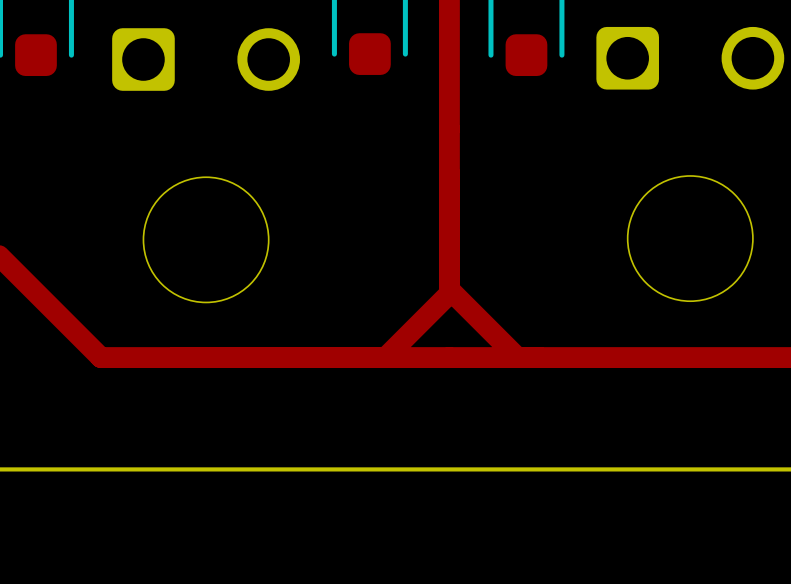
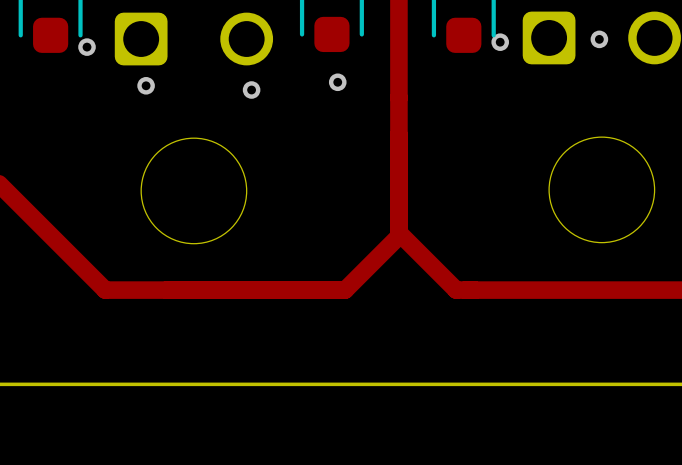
via: none -> (599, 39)
via: none -> (500, 42)
via: none -> (87, 47)
via: none -> (337, 82)
via: none -> (146, 85)
via: none -> (251, 90)
track: (385, 357) (517, 357) -> none

